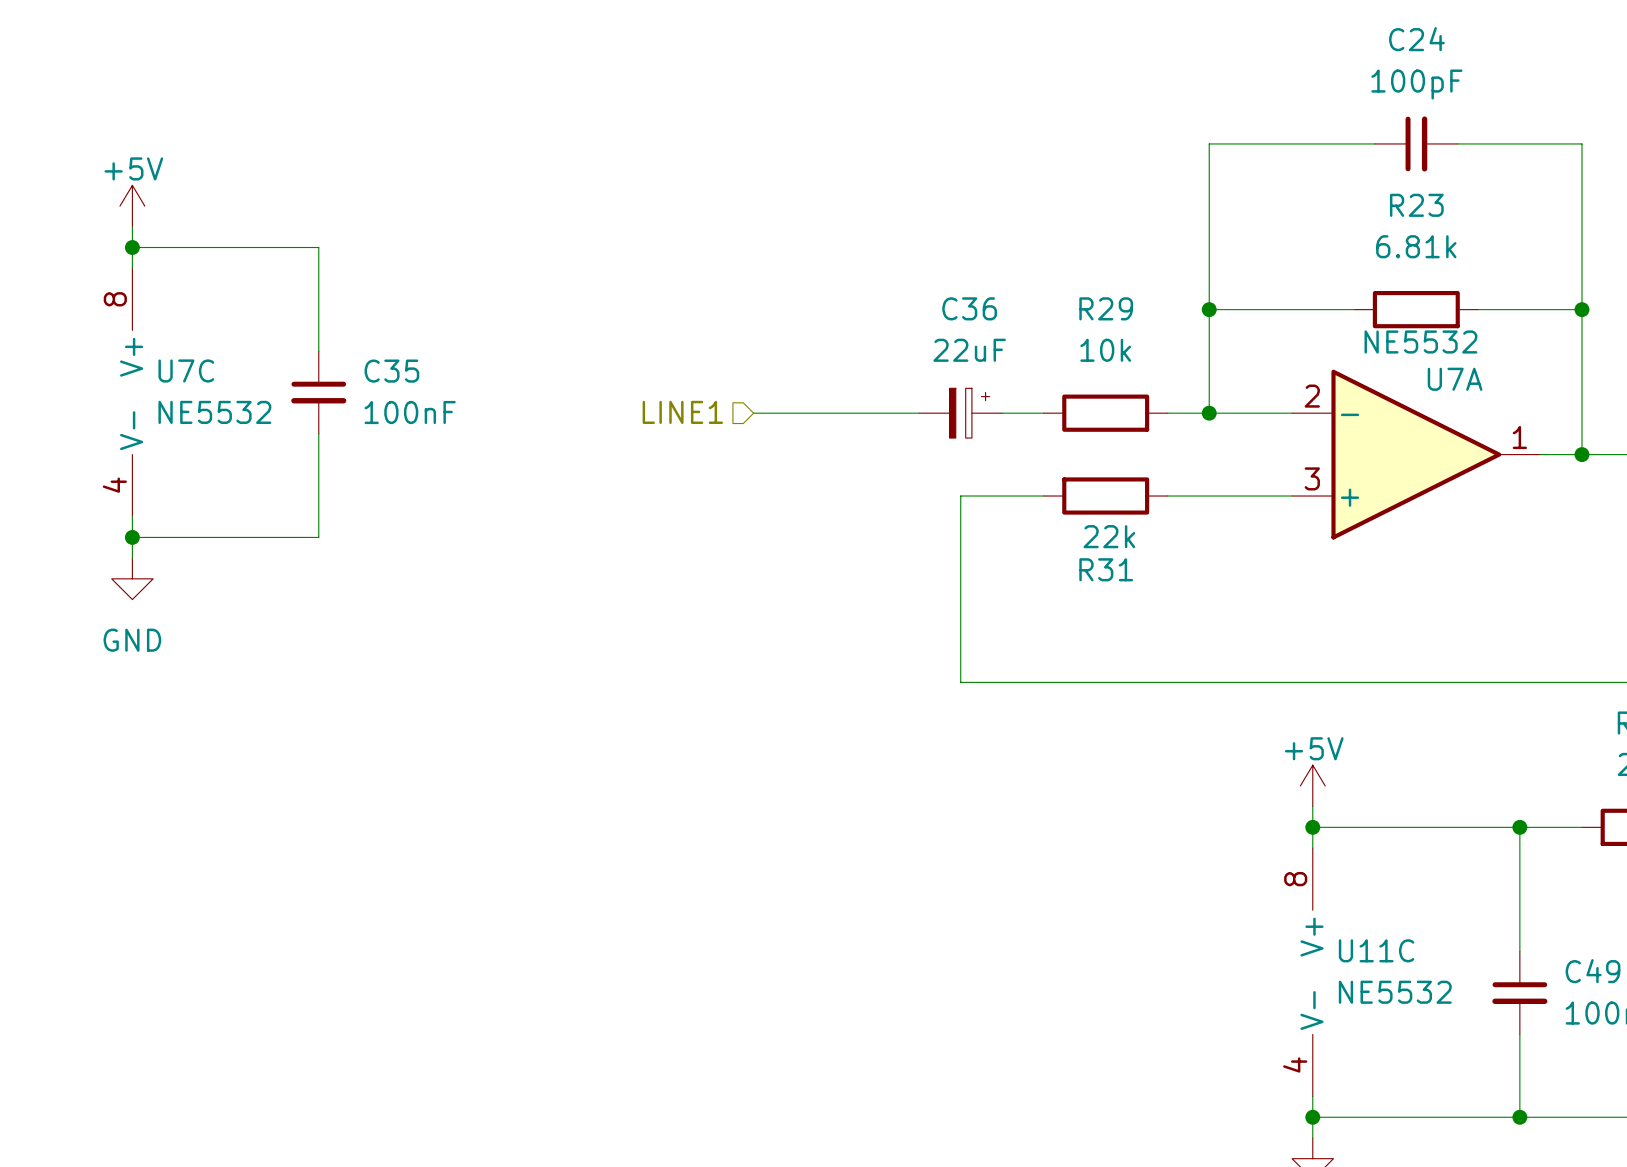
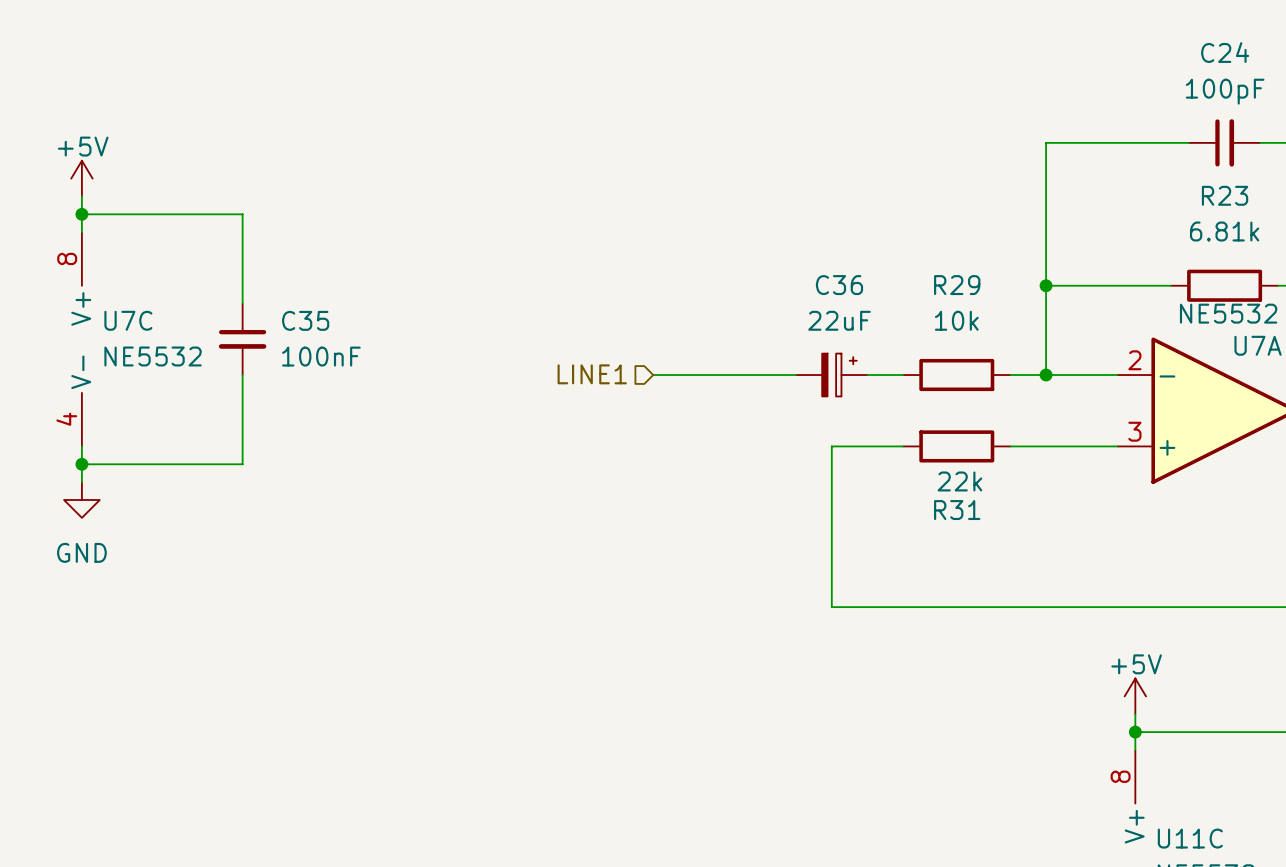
power symbol position: +5V (132, 206) -> +5V (81, 178)
wire: (132, 226) (132, 268) -> (81, 196) (81, 232)
wire: (132, 247) (318, 247) (318, 351) -> (81, 214) (242, 214) (242, 303)
junction position: (132, 247) -> (81, 214)
U7C position: (132, 392) -> (81, 339)
C35 position: (318, 392) -> (242, 339)
wire: (318, 433) (318, 537) (132, 537) -> (242, 375) (242, 464) (81, 464)
wire: (132, 516) (132, 558) -> (81, 446) (81, 482)
junction position: (132, 537) -> (81, 464)
power symbol position: GND (132, 578) -> GND (81, 499)

